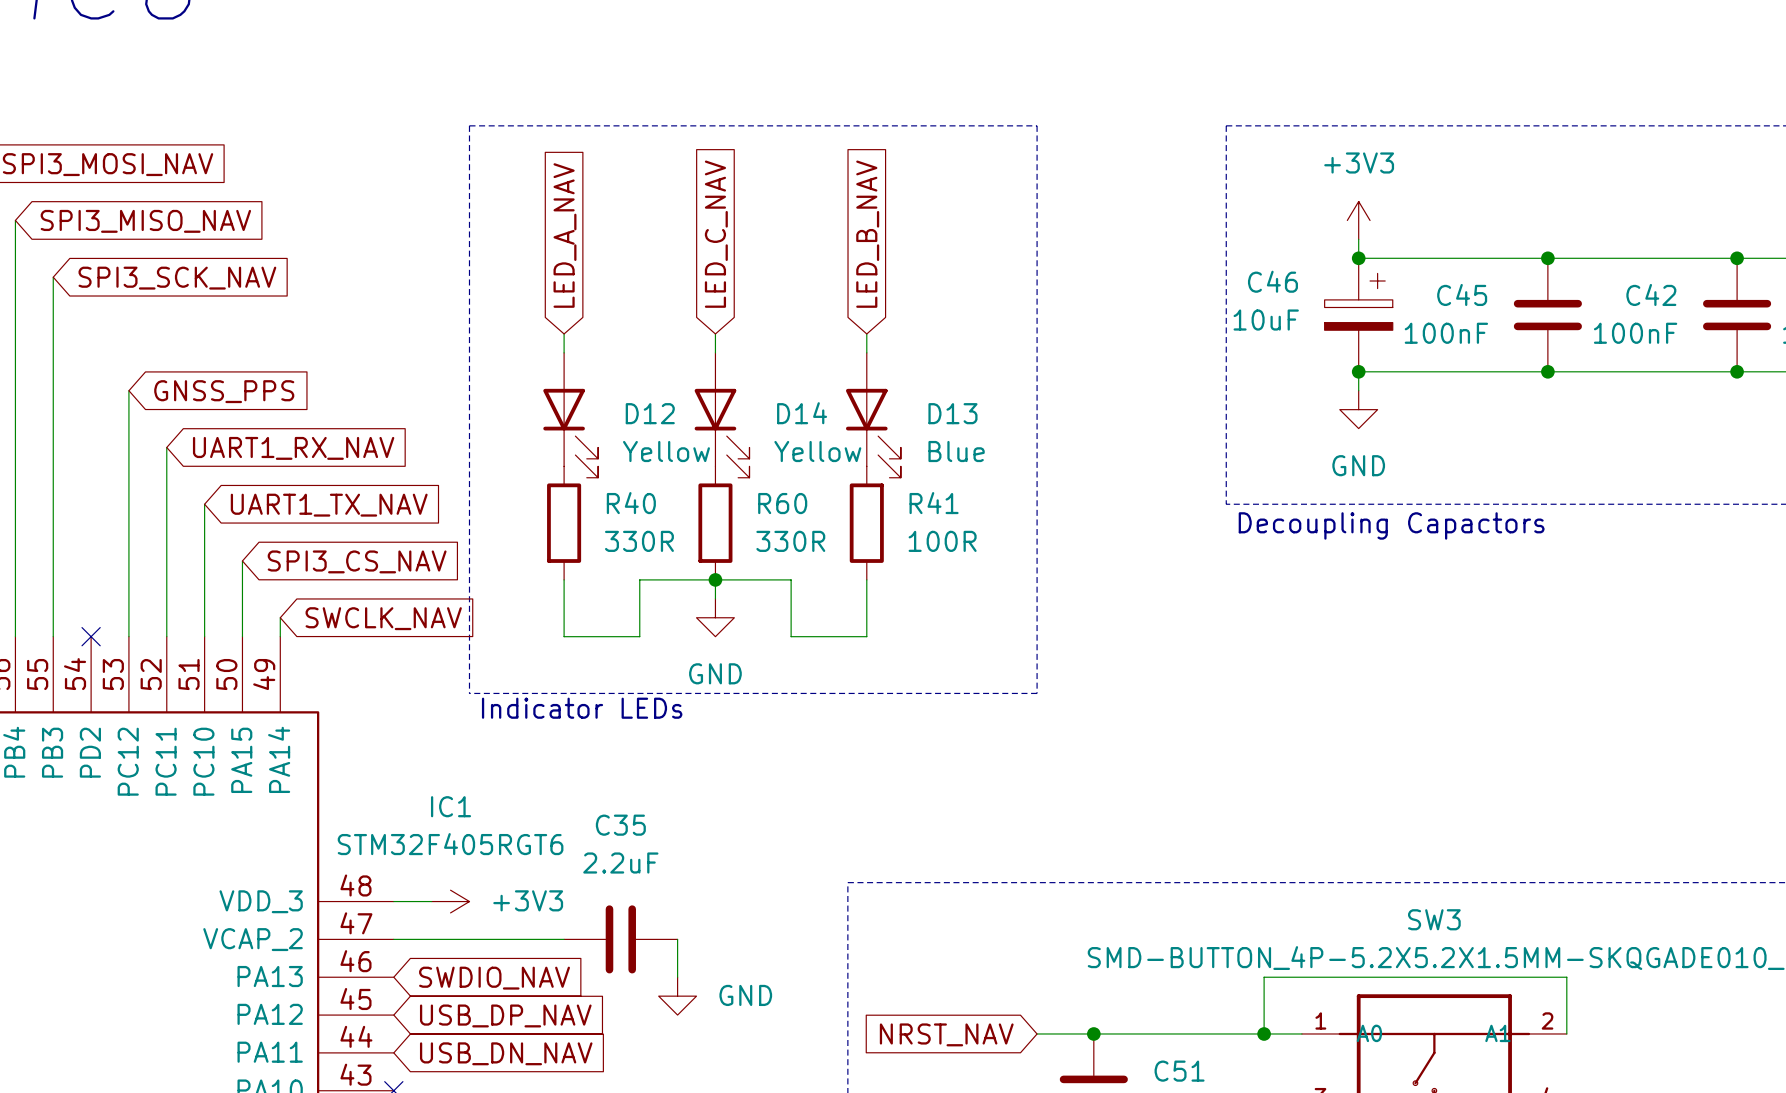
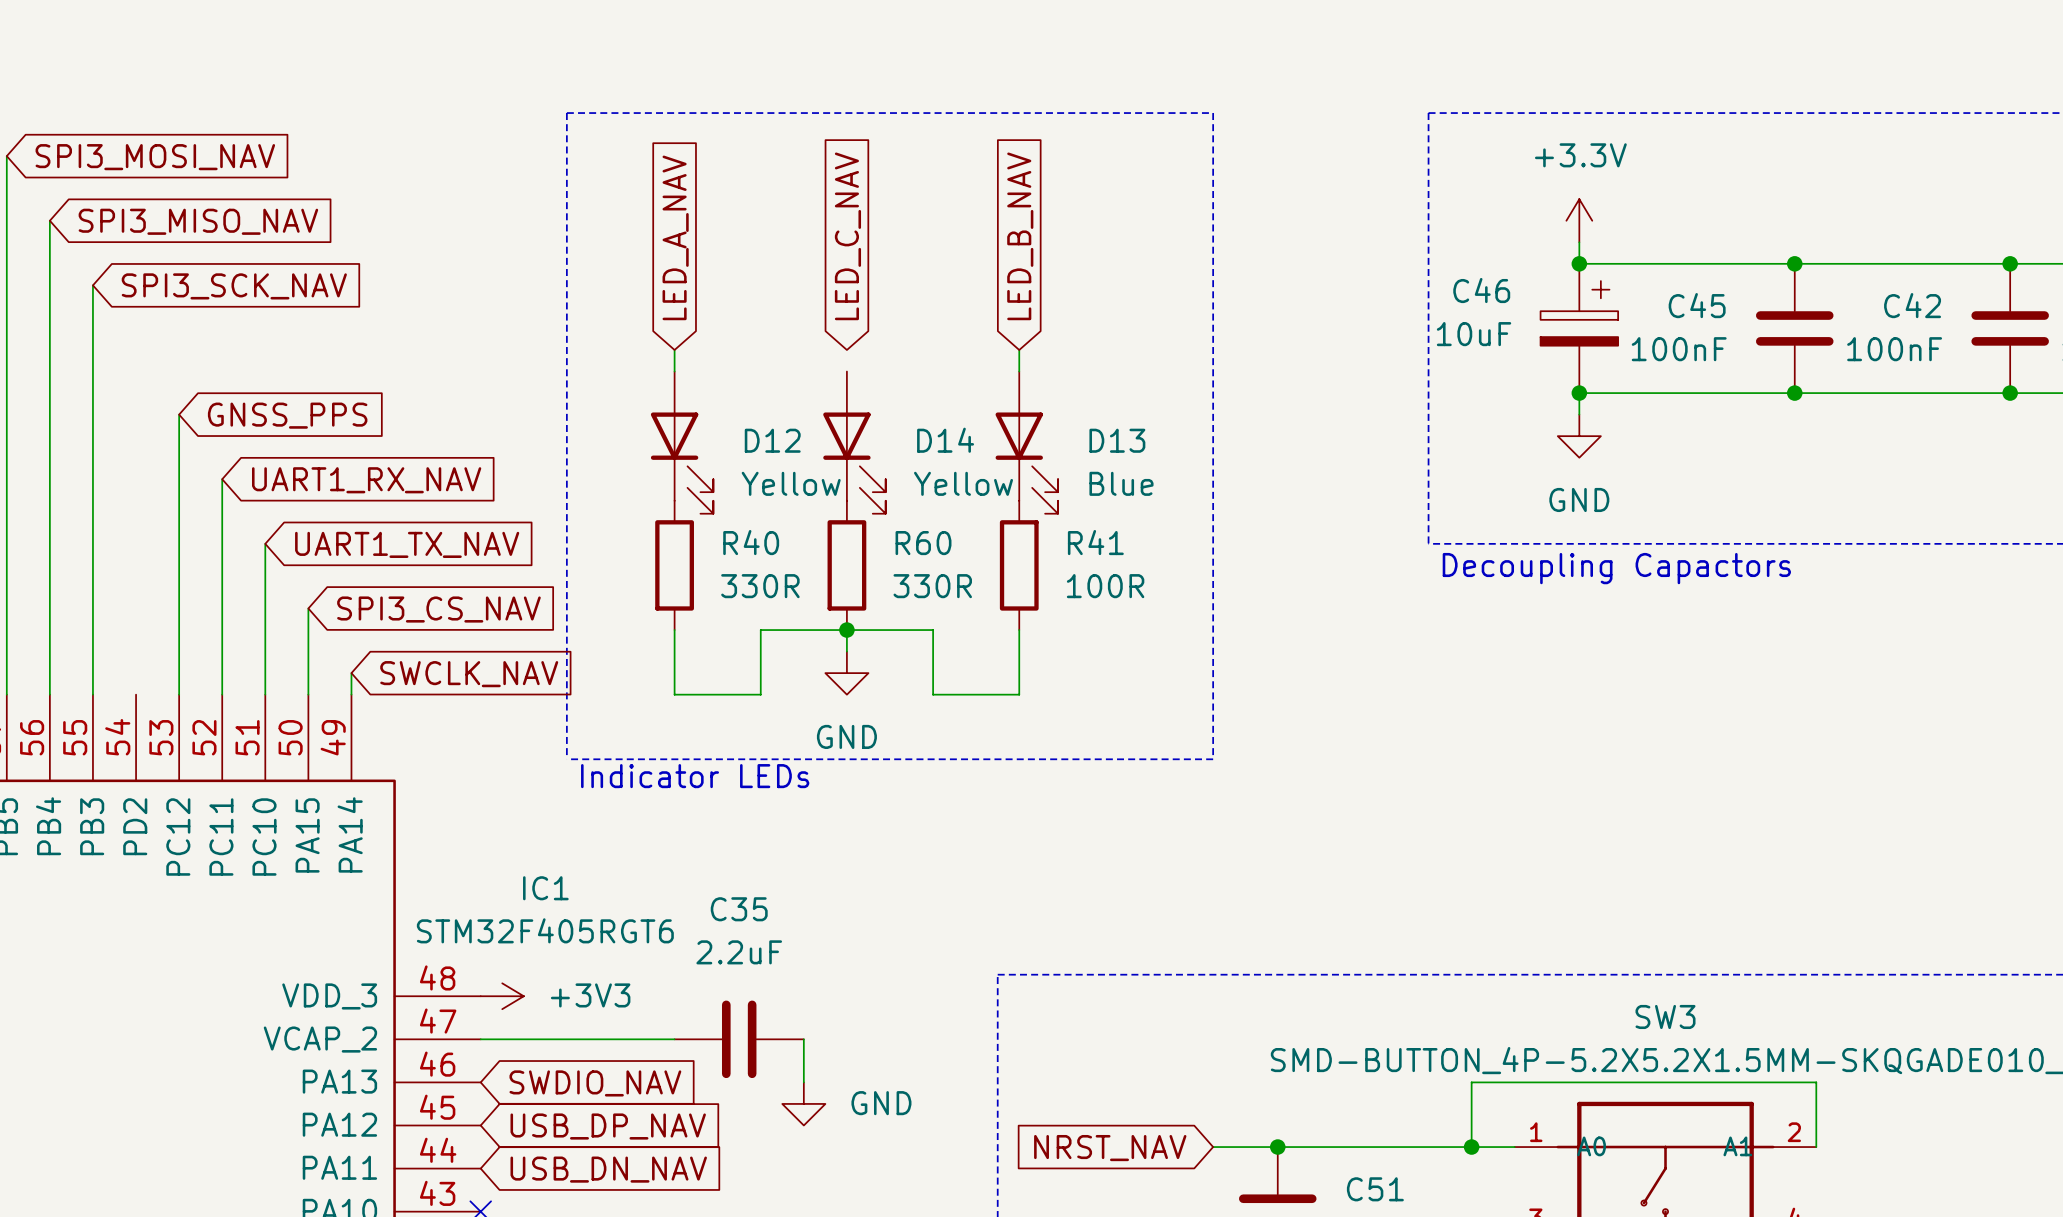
power symbol: +3V3 (1358, 220) -> +3.3V (1579, 220)
wire: (715, 333) (715, 352) -> none
no-connect mark: (91, 636) -> none
power symbol position: +3V3 (450, 901) -> +3V3 (502, 996)

